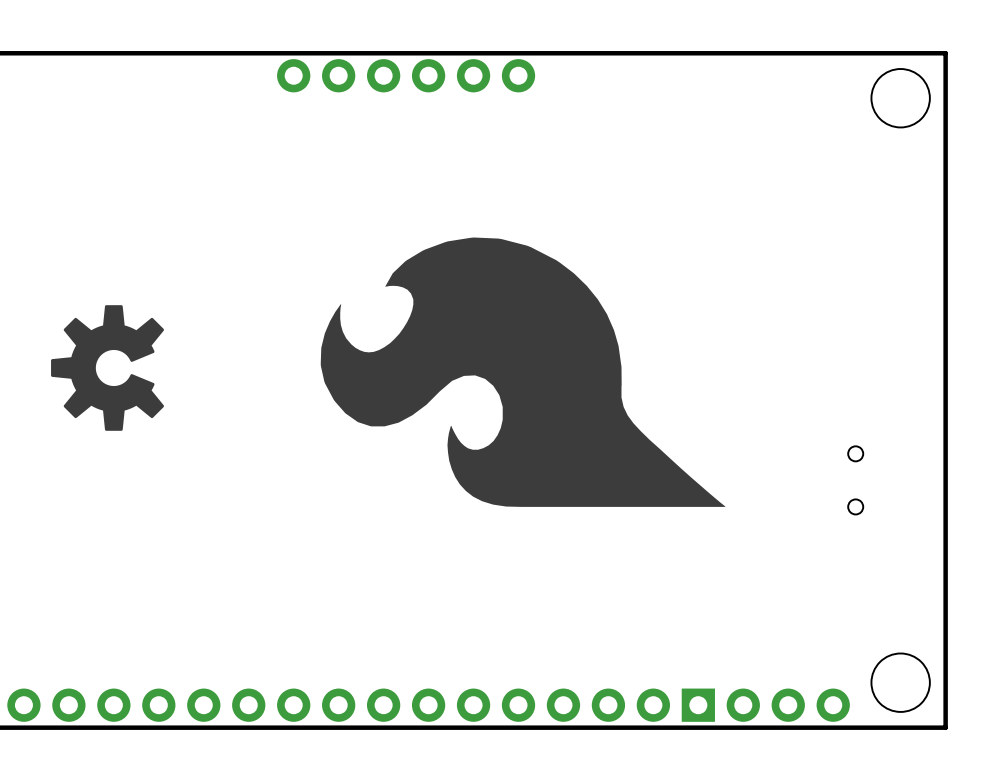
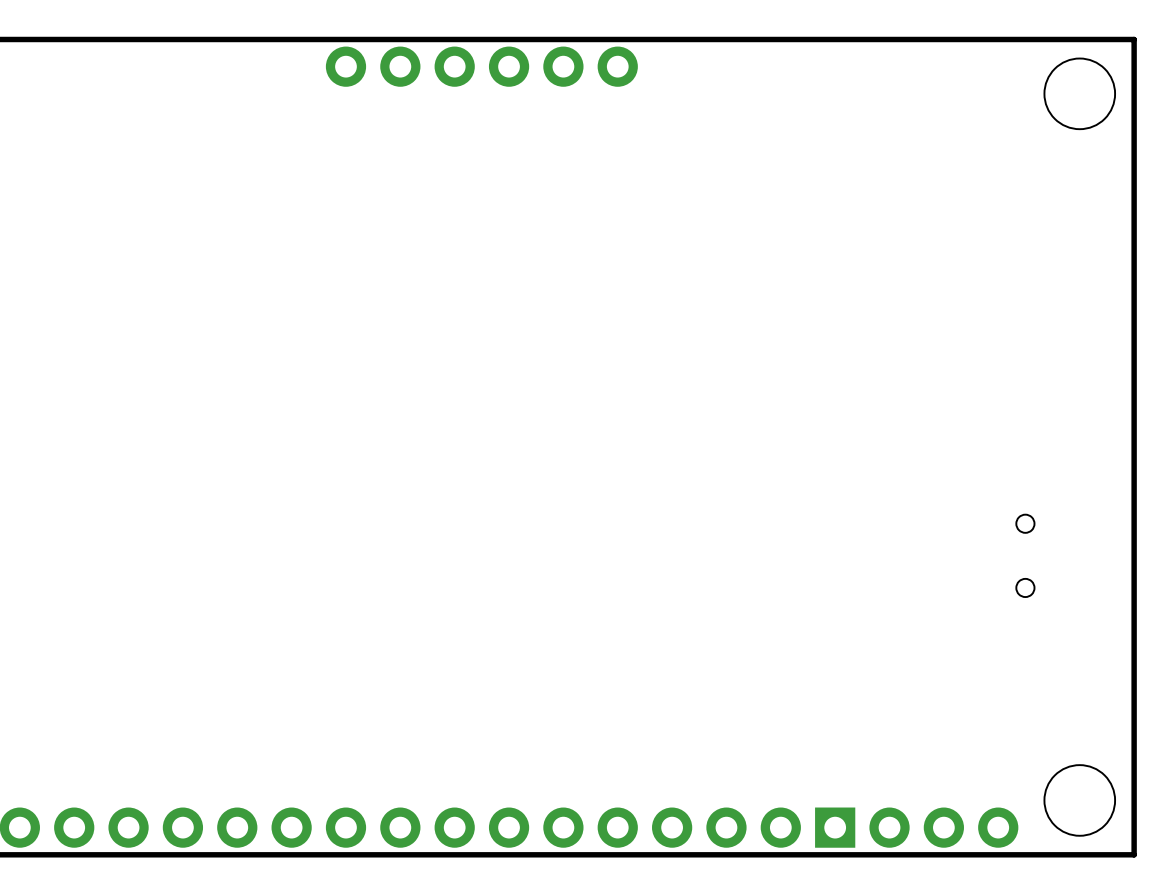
drawing: [320, 237, 726, 507] -> none
drawing: [51, 305, 165, 431] -> none

